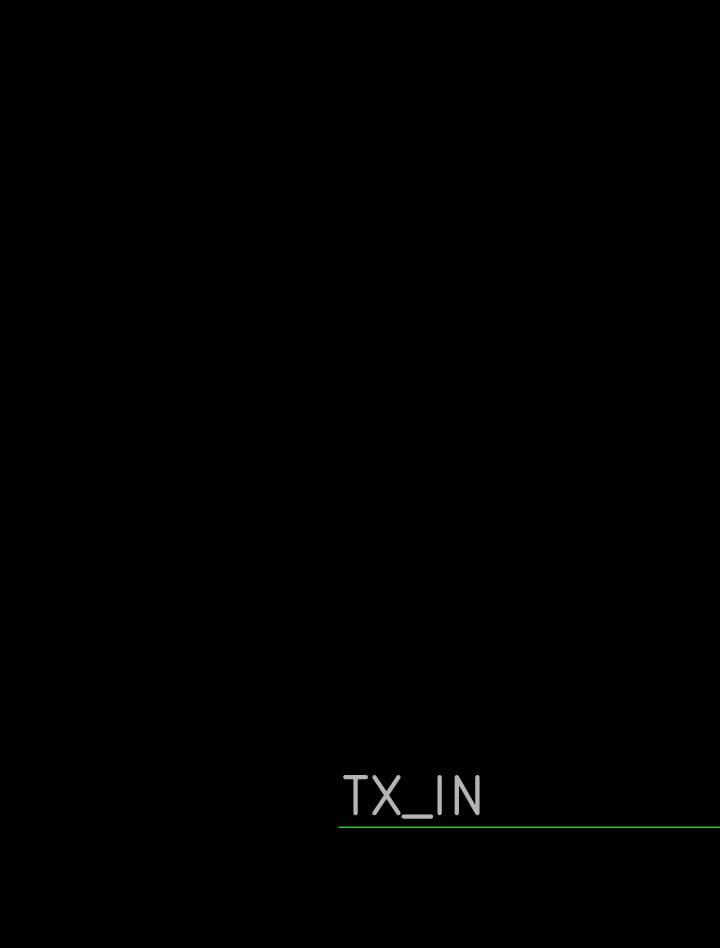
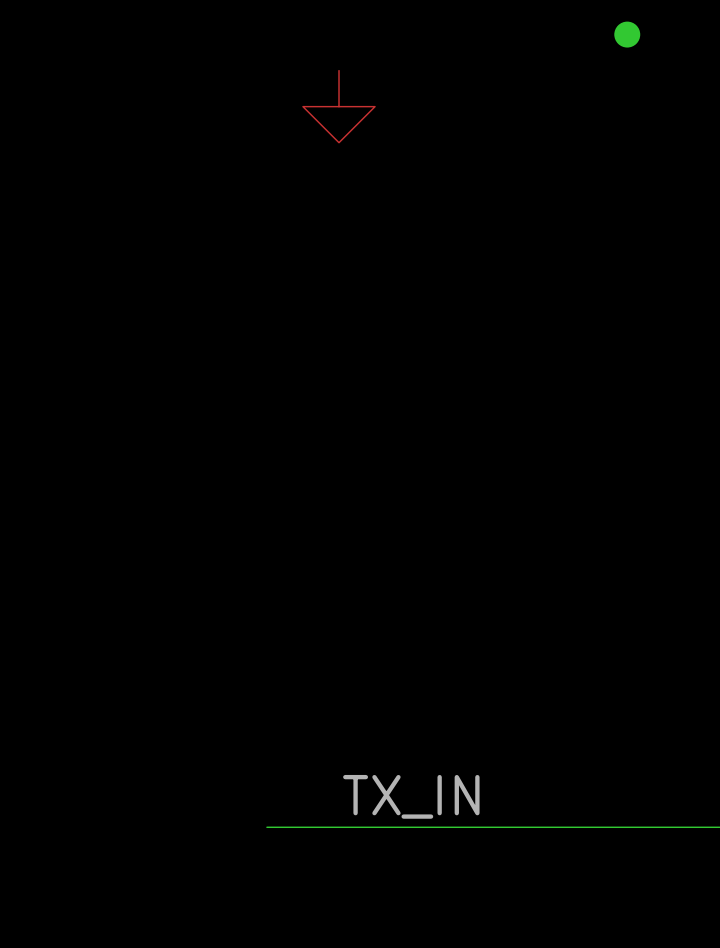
junction: none -> (627, 34)
power symbol: none -> (339, 106)
wire: none -> (266, 827) (339, 827)

